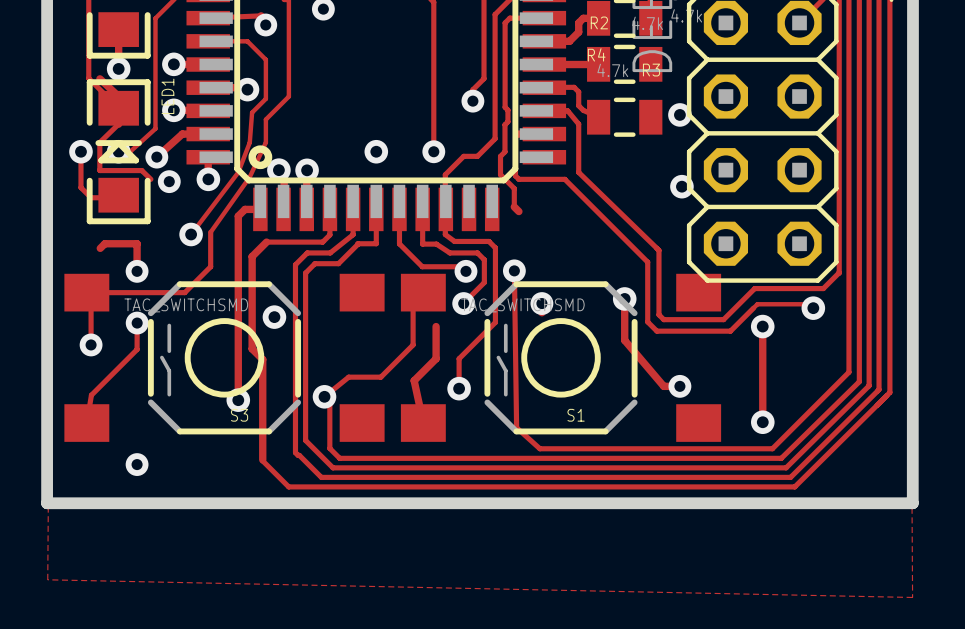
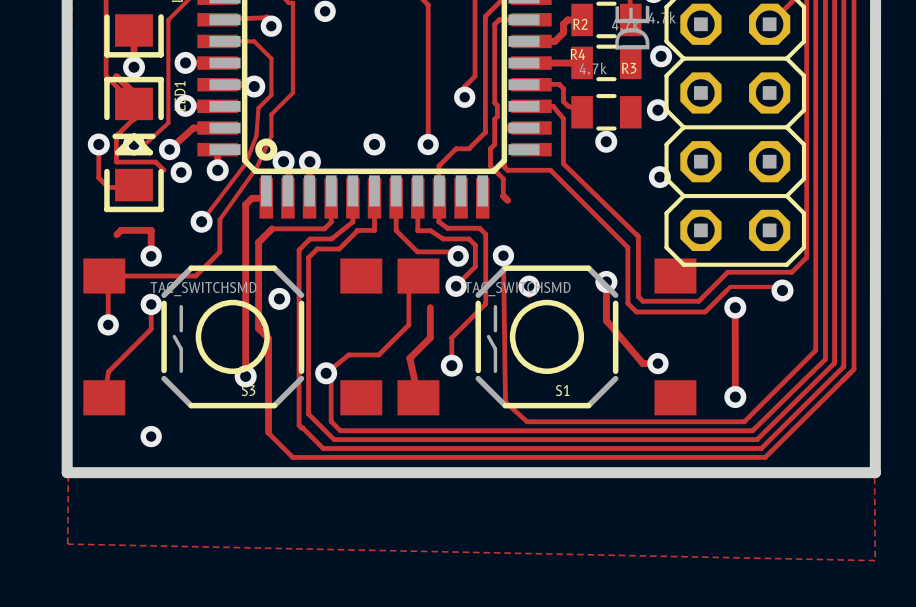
via: none -> (661, 56)
via: none -> (606, 141)

